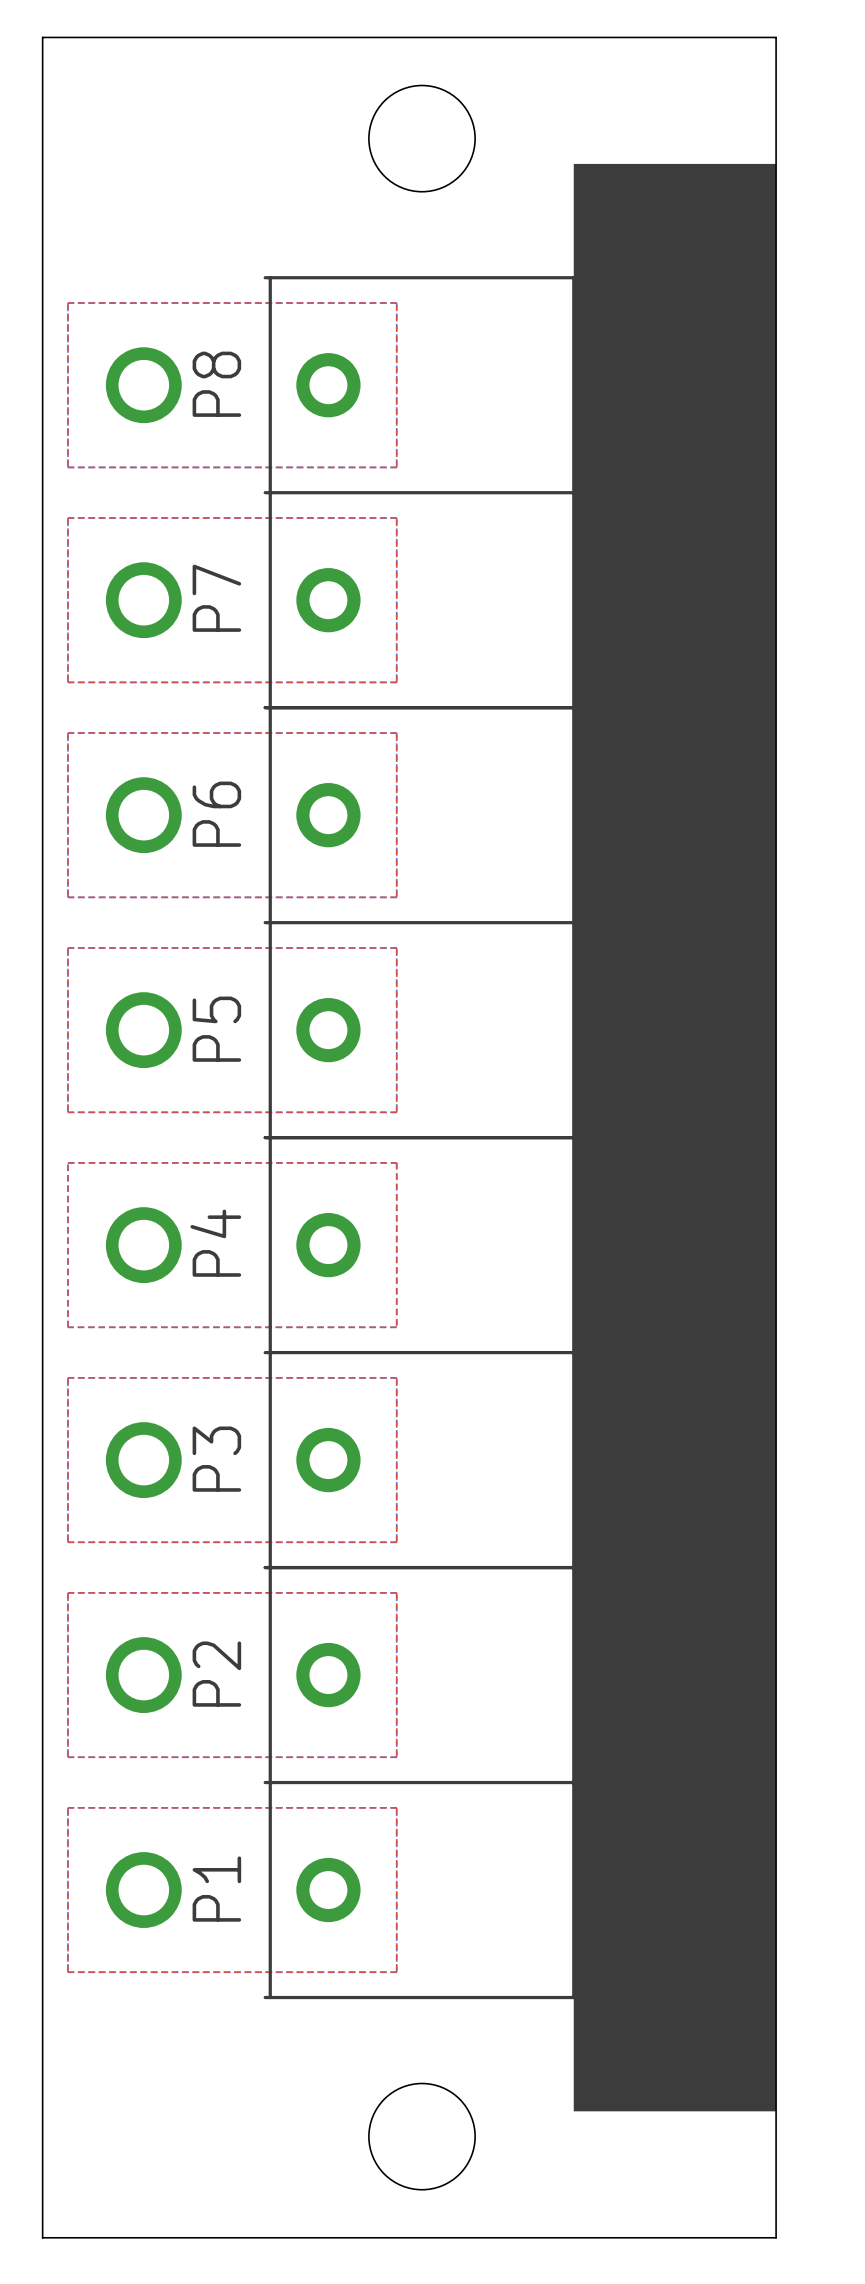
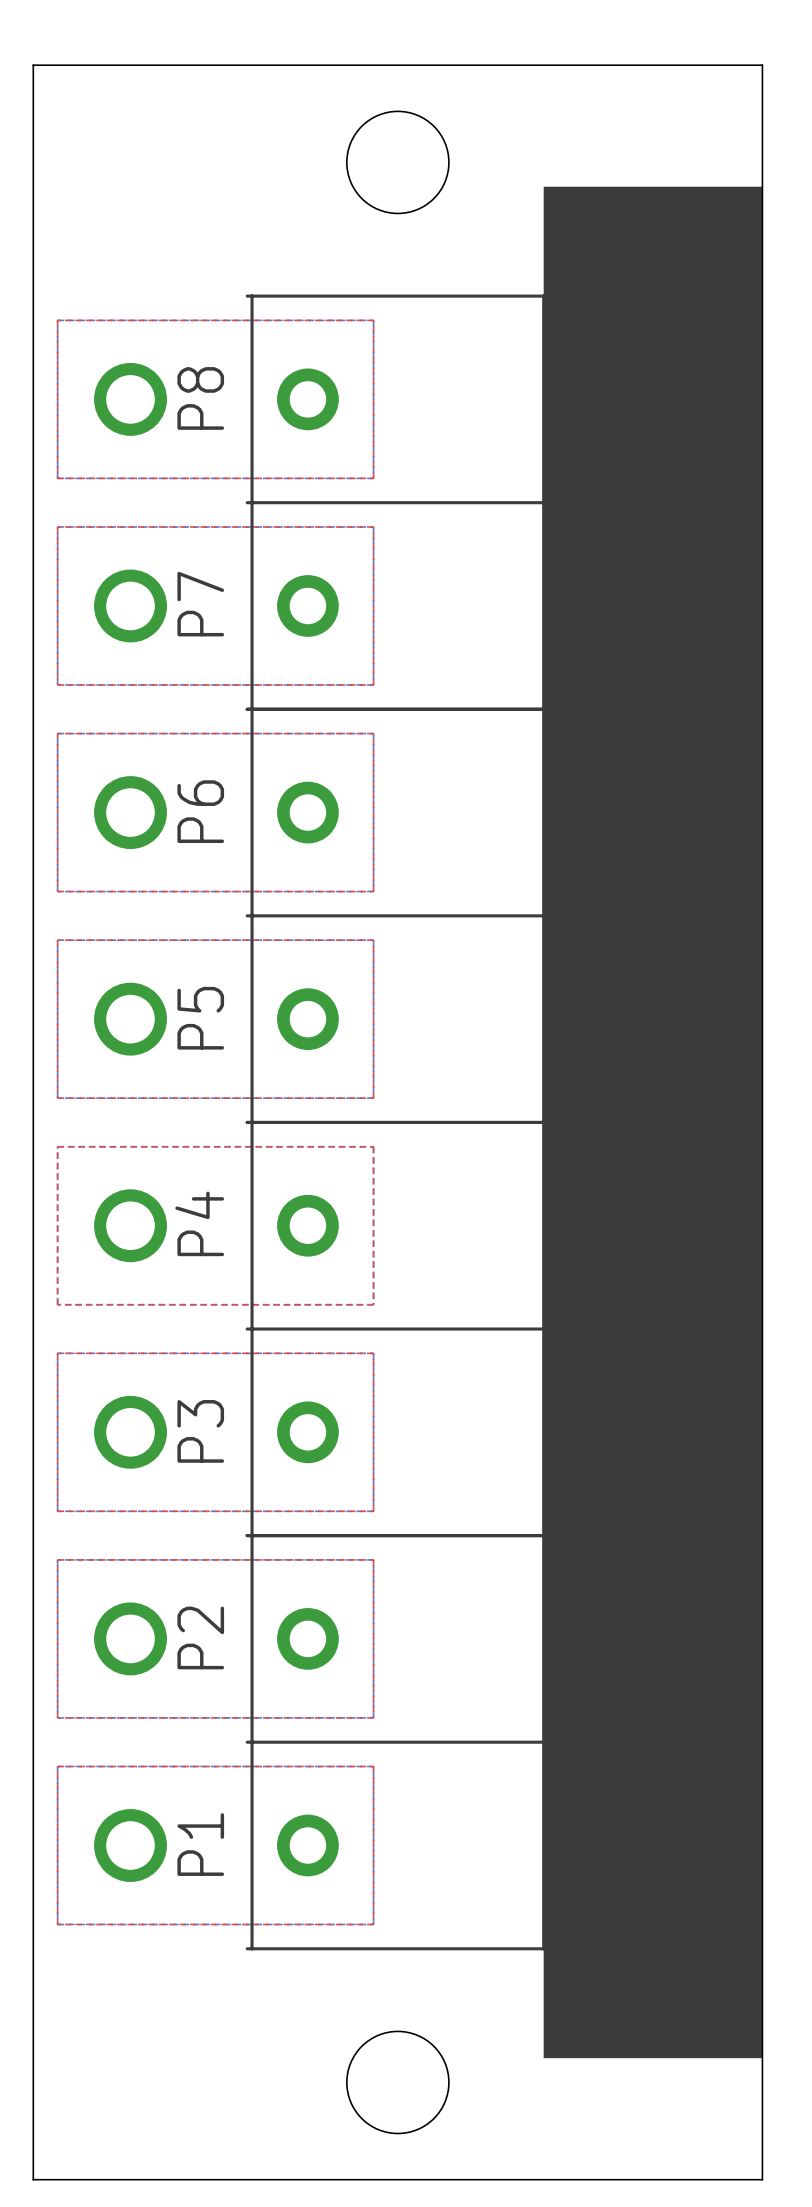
board edge: (776, 37) (776, 2237) -> (738, 65) (762, 65) (762, 2179) (738, 2179)
drawing shape: [573, 163, 777, 2112] -> [543, 186, 763, 2059]

